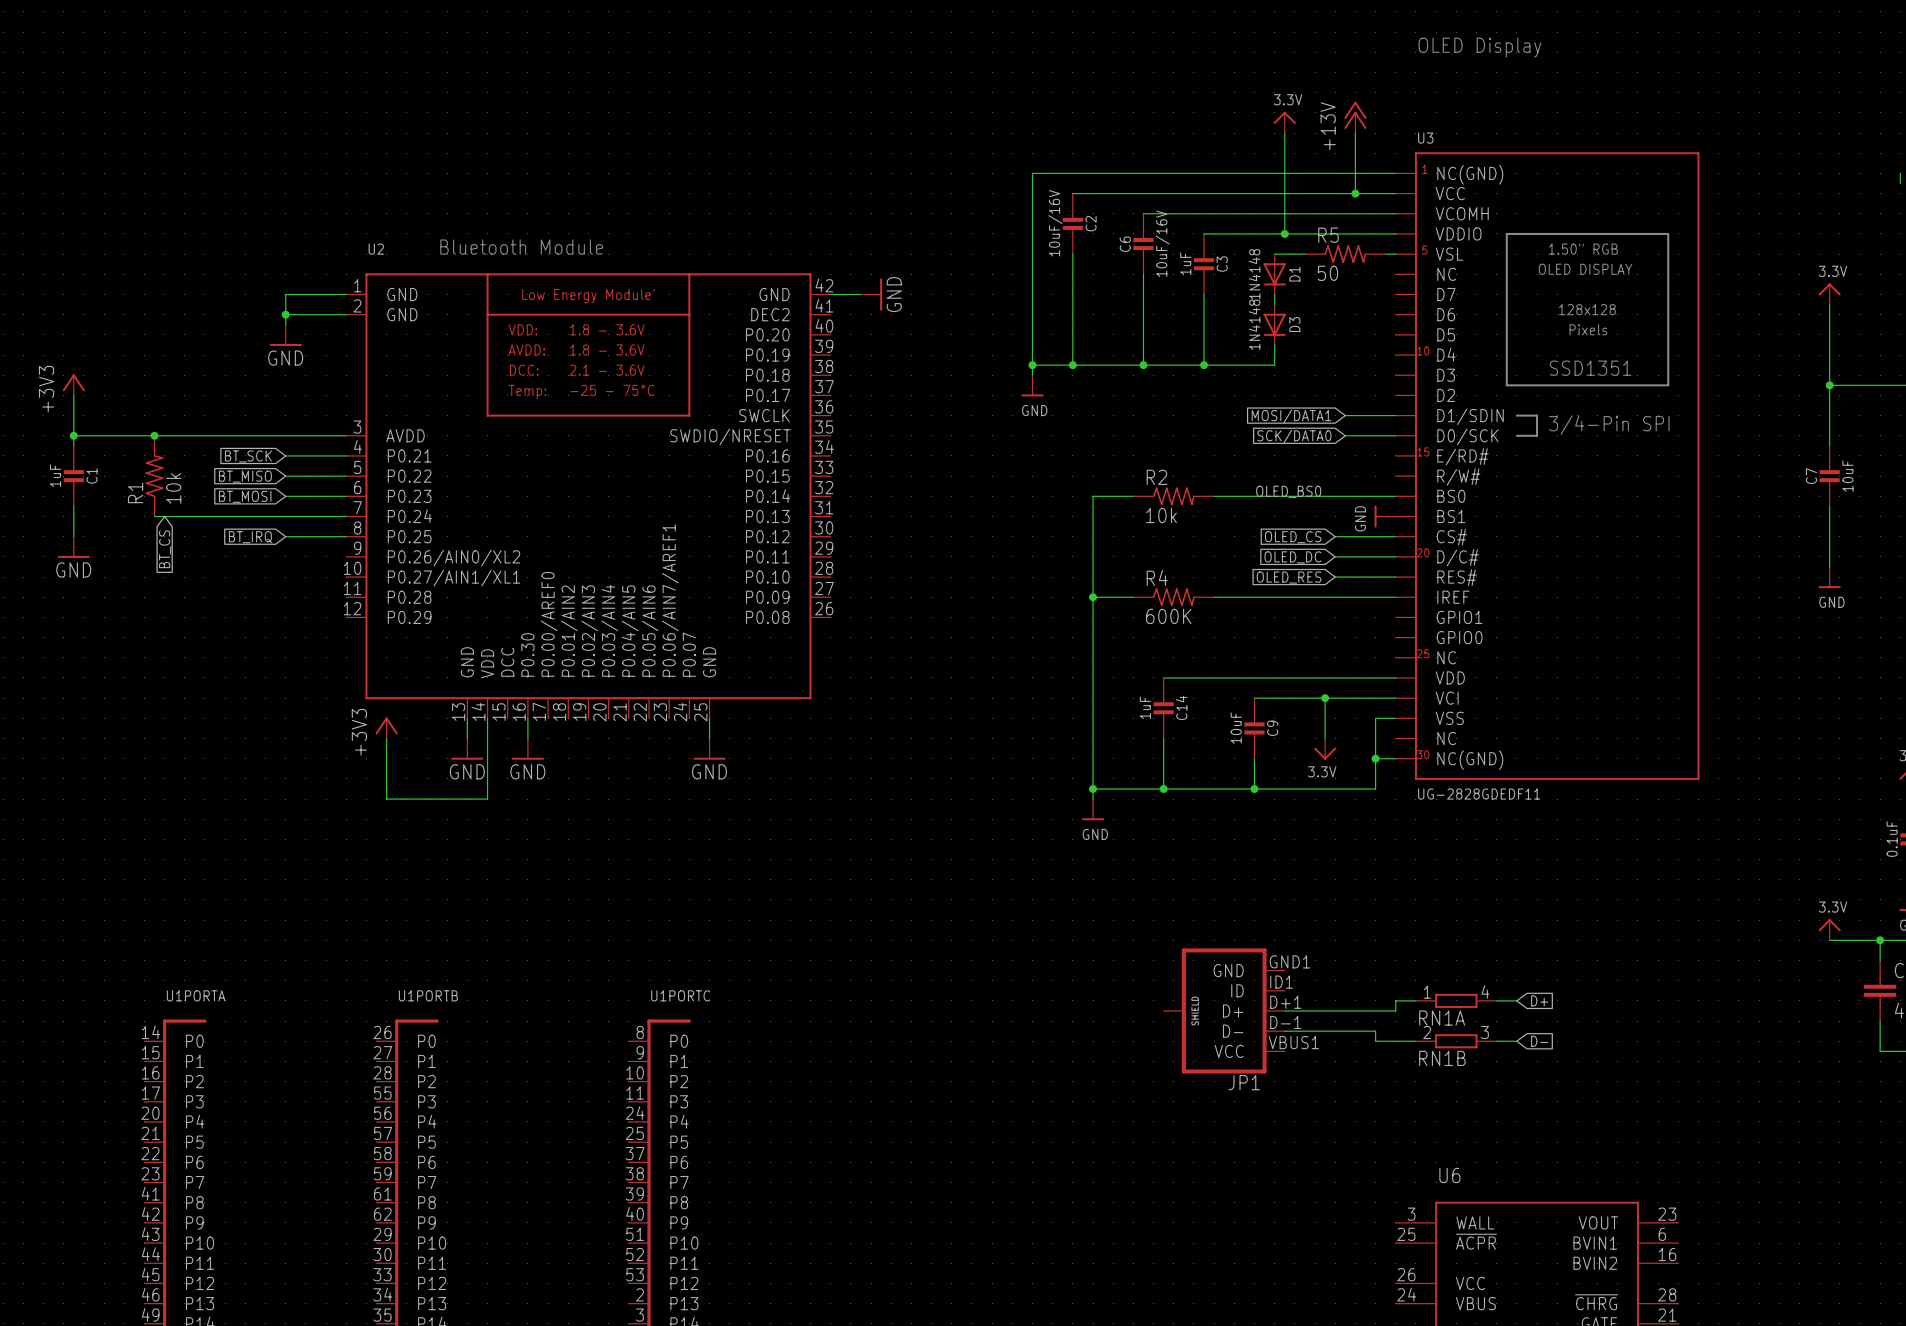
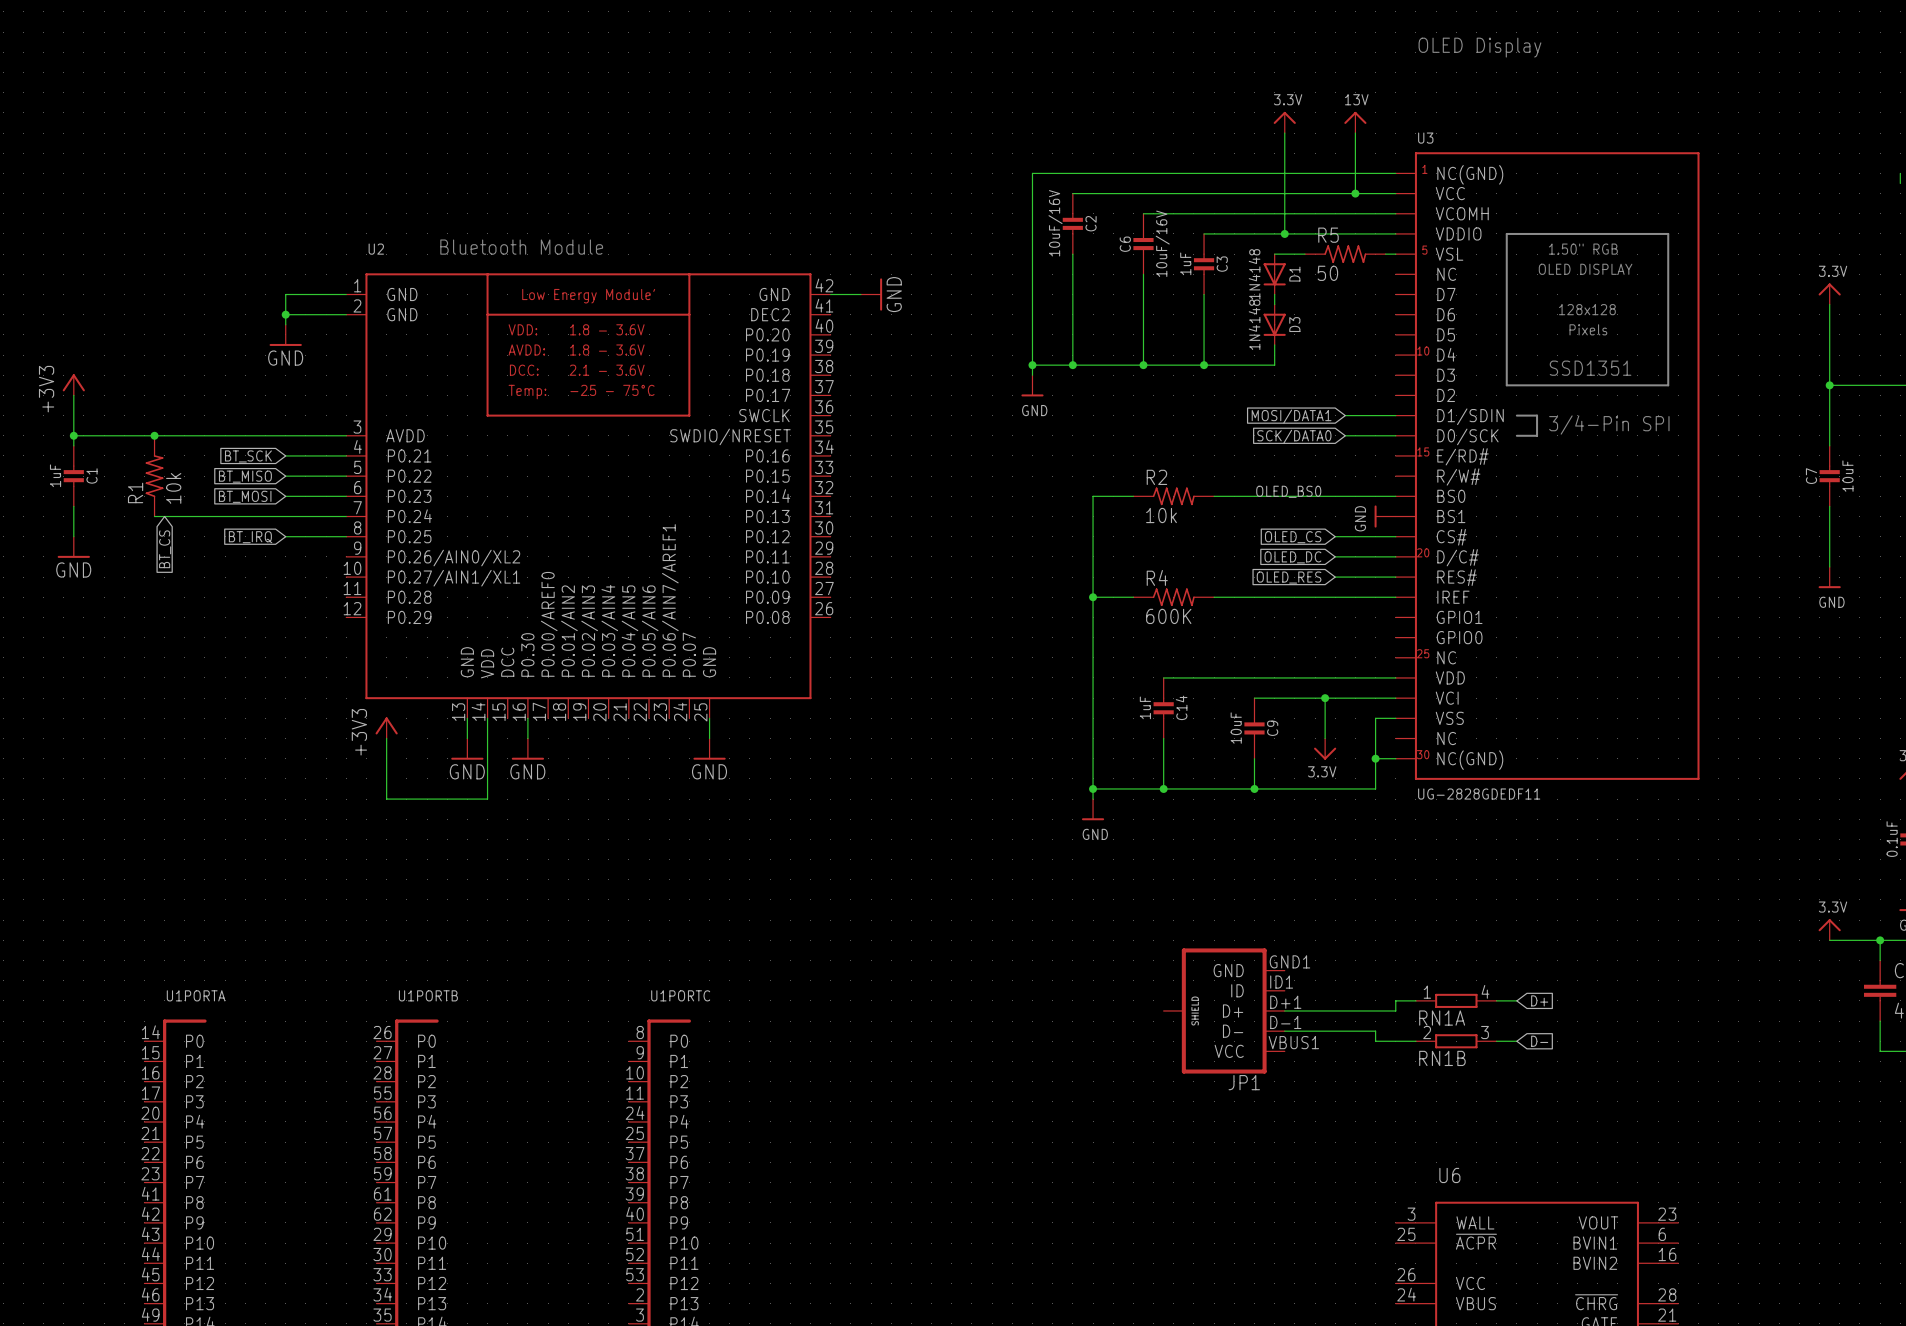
power symbol: +13V (1355, 117) -> 13V (1355, 122)

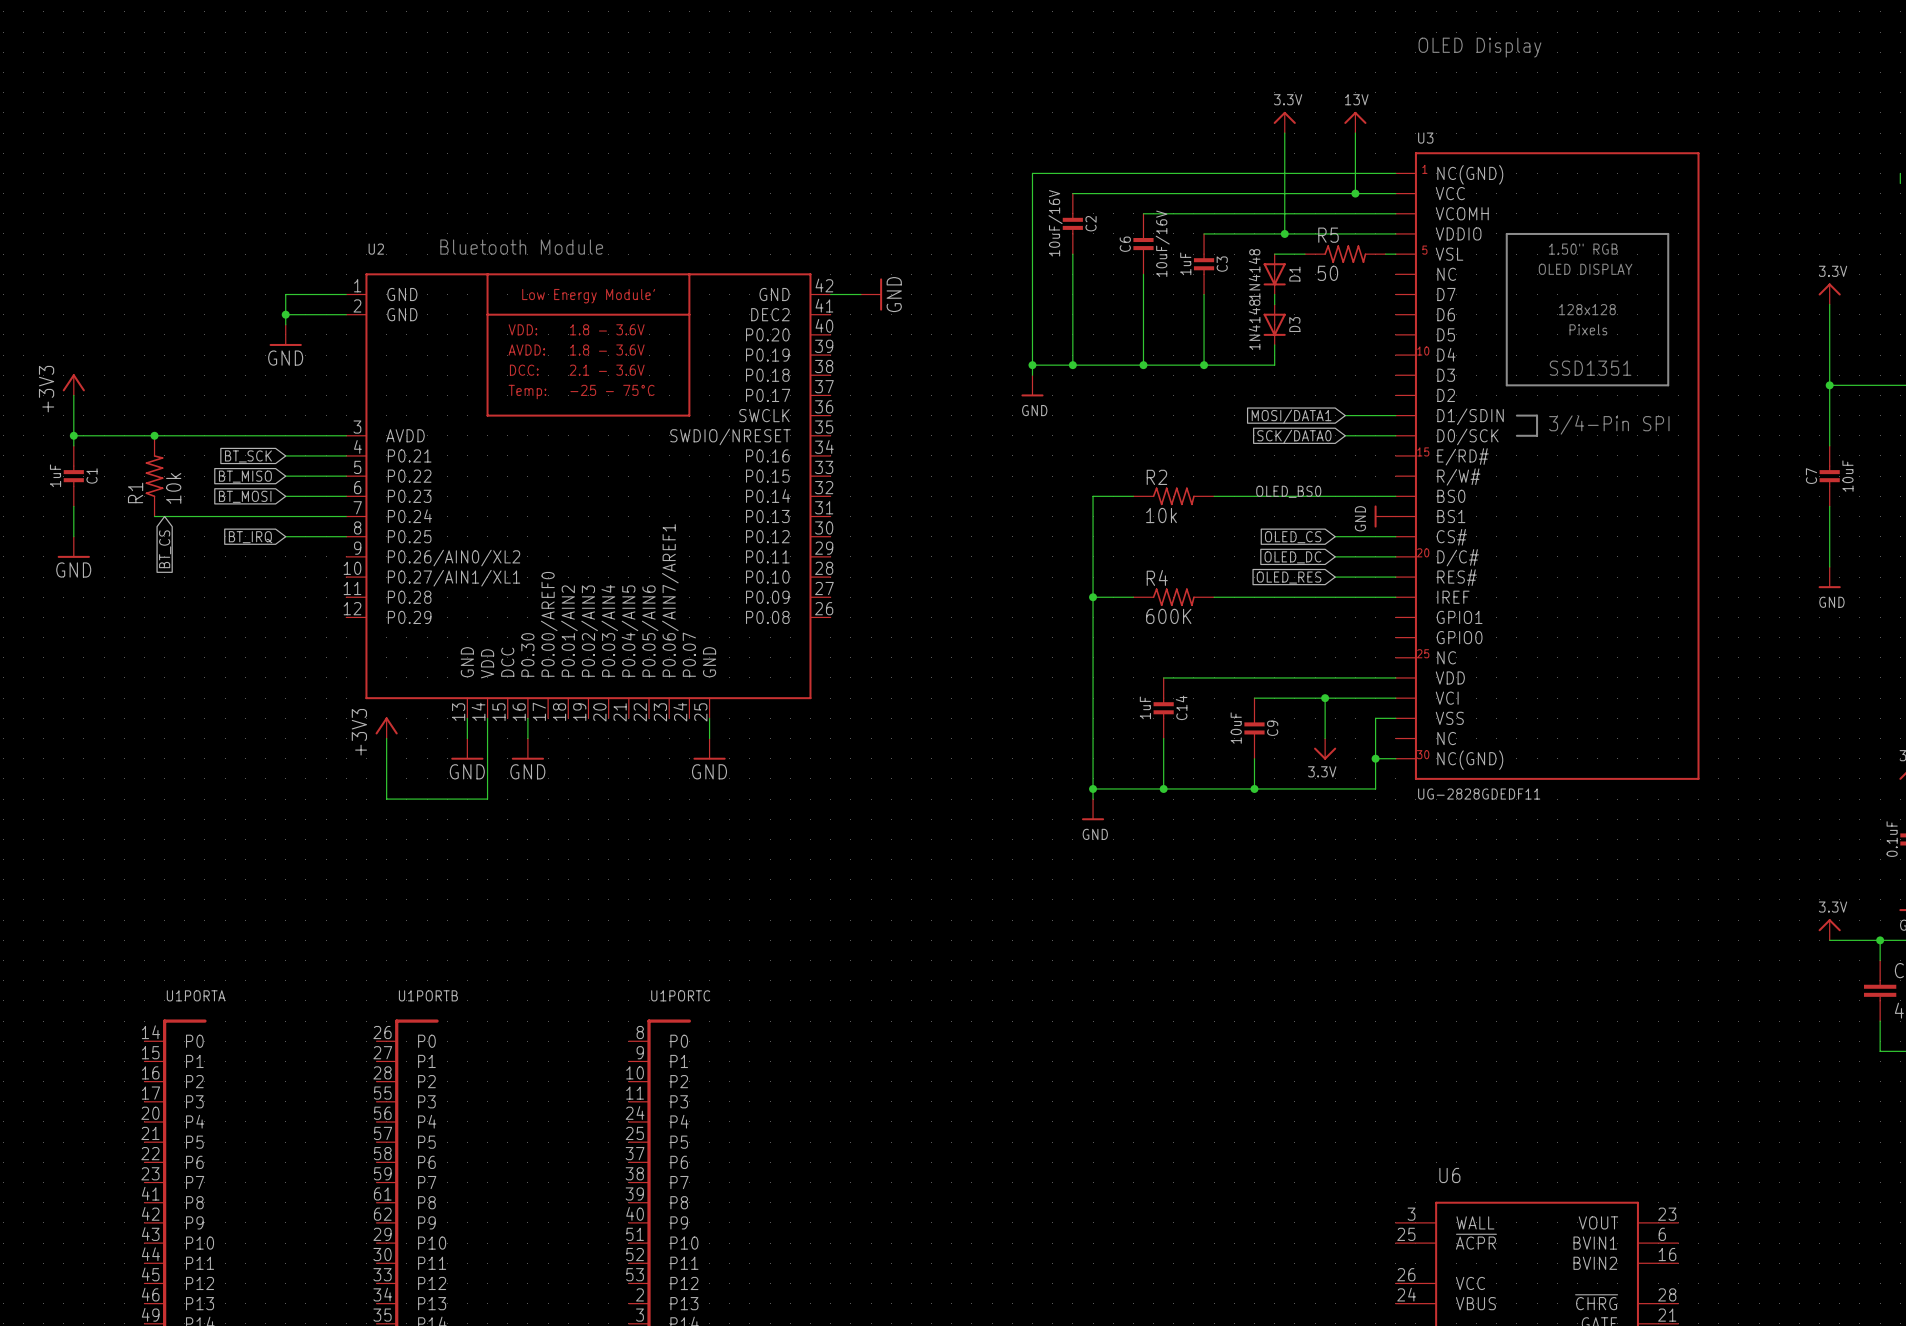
wire: (1415, 1000) (1395, 1000) (1395, 1010) (1284, 1010) -> none
RN1A: (1456, 1000) -> none
wire: (1496, 1000) (1516, 1000) -> none
global label: D+ (1539, 1000) -> none
JP1: (1224, 1010) -> none
wire: (1284, 1031) (1375, 1031) (1375, 1041) (1415, 1041) -> none
RN1B: (1456, 1041) -> none
wire: (1496, 1041) (1516, 1041) -> none
global label: D- (1539, 1041) -> none

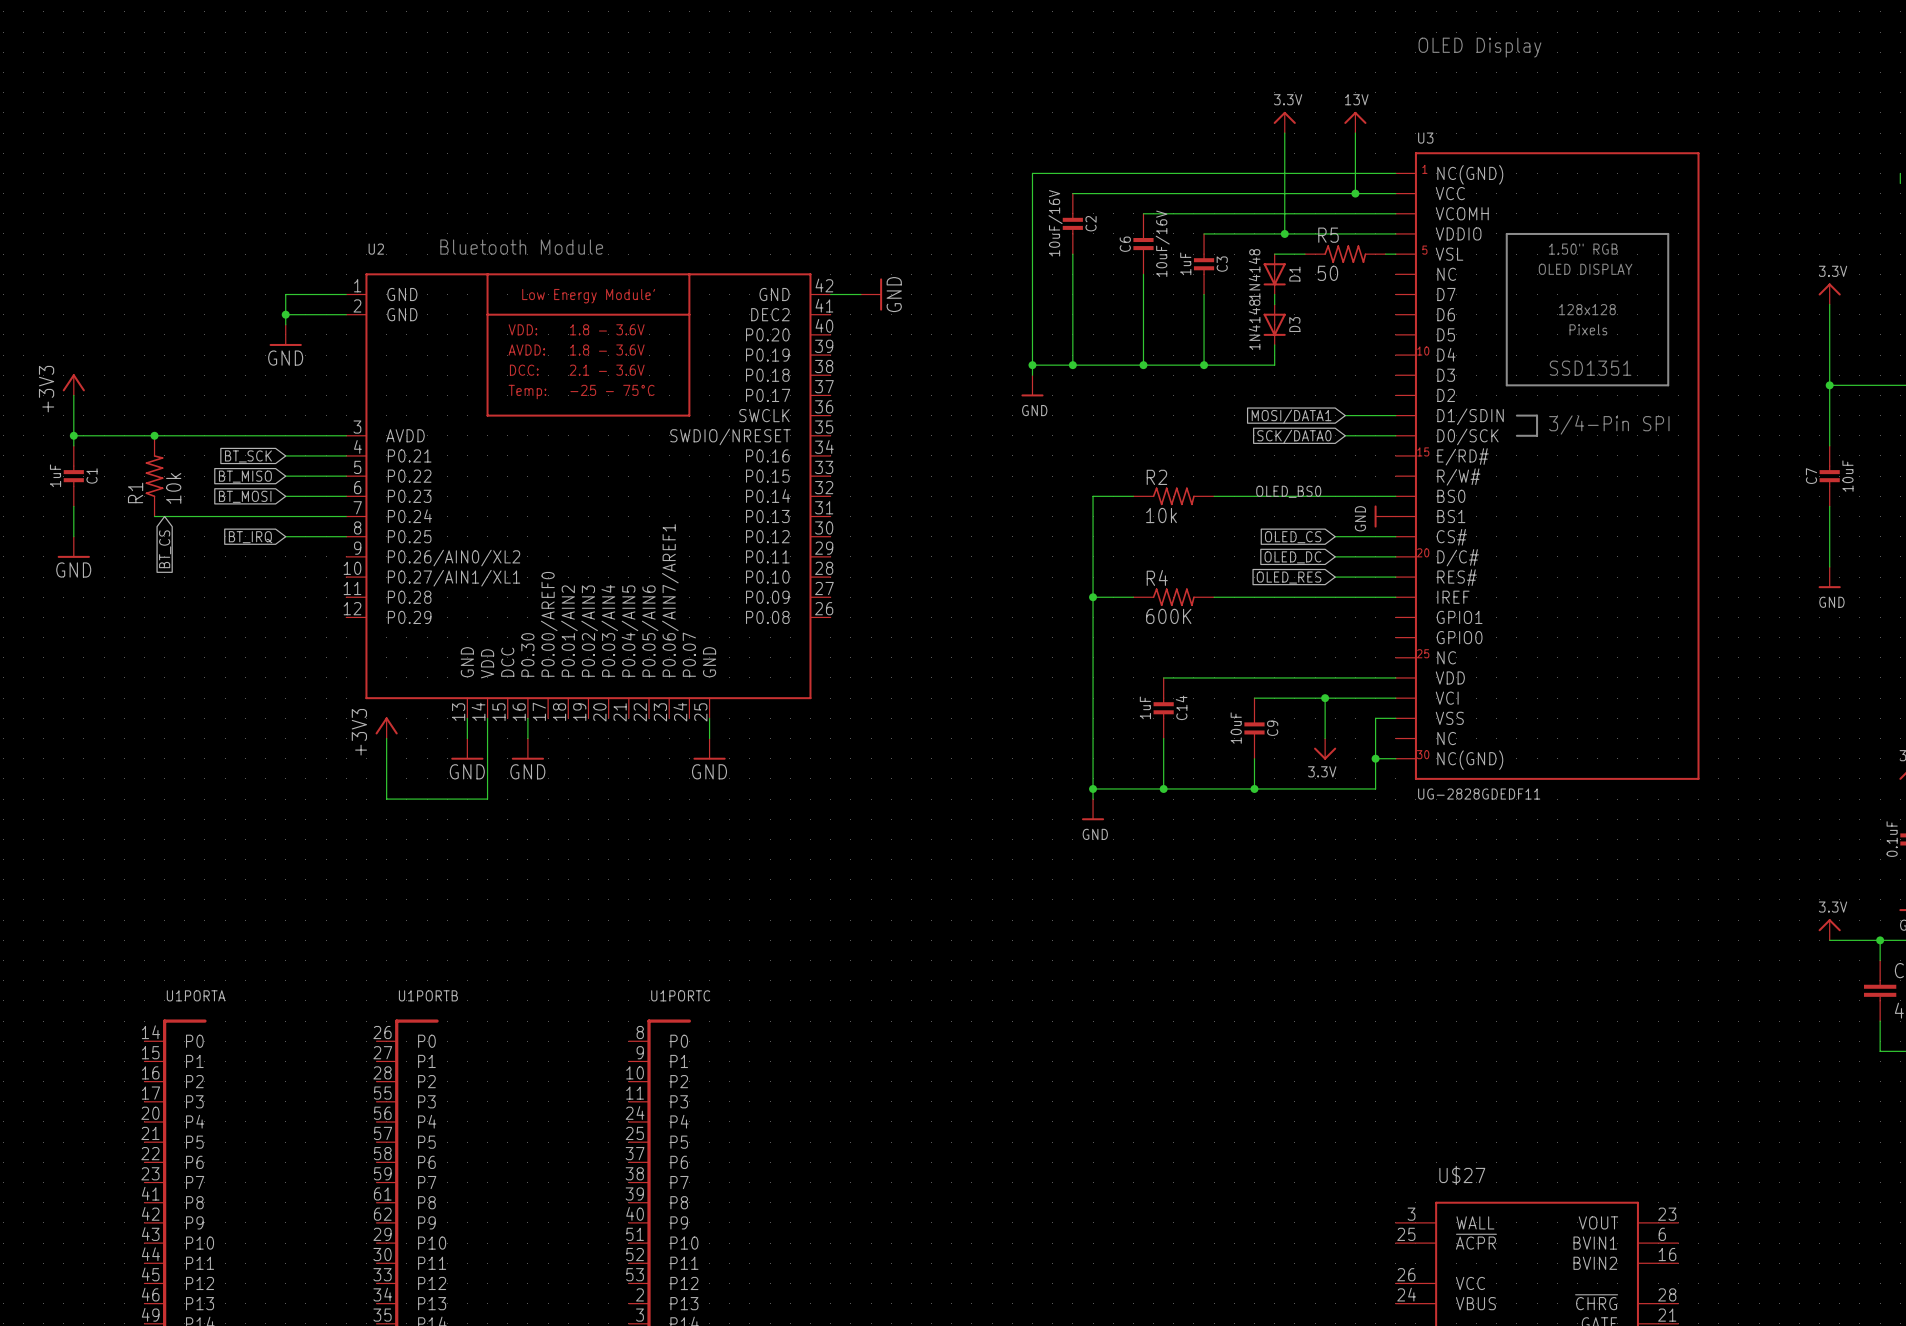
U6 name: U6 (1449, 1175) -> U$27 (1462, 1175)

